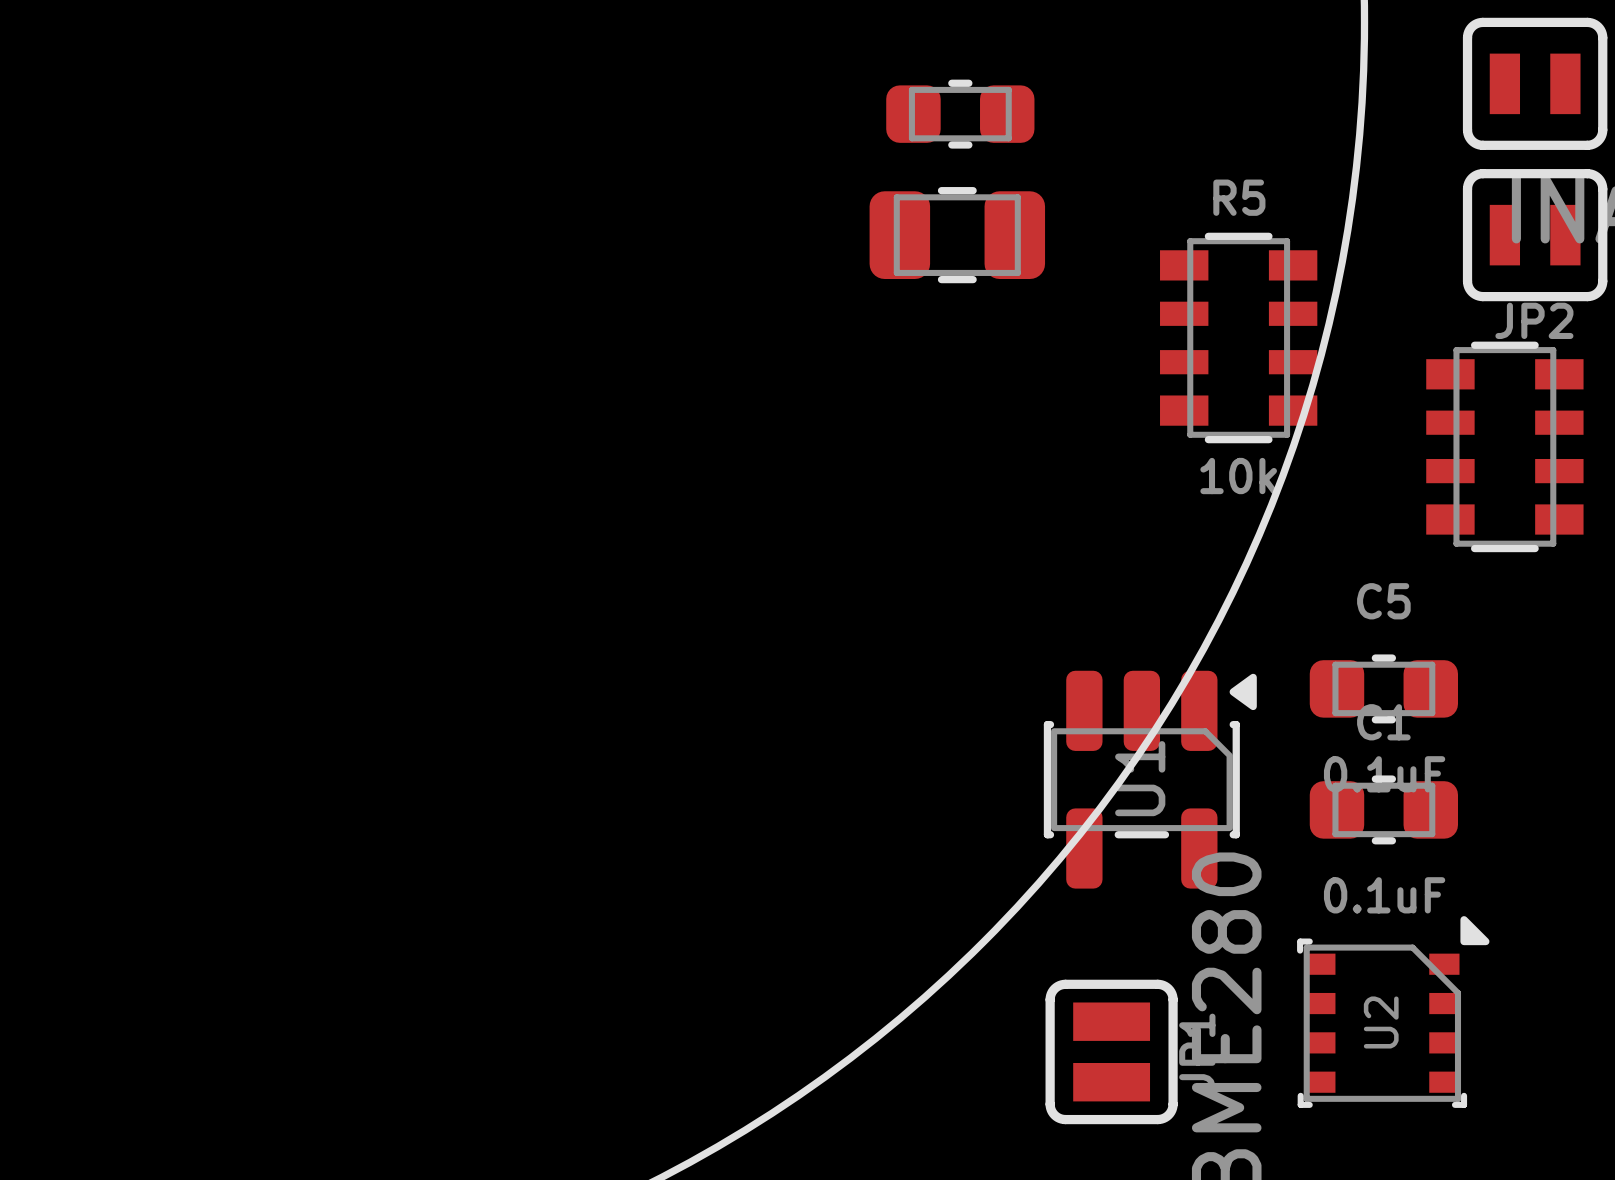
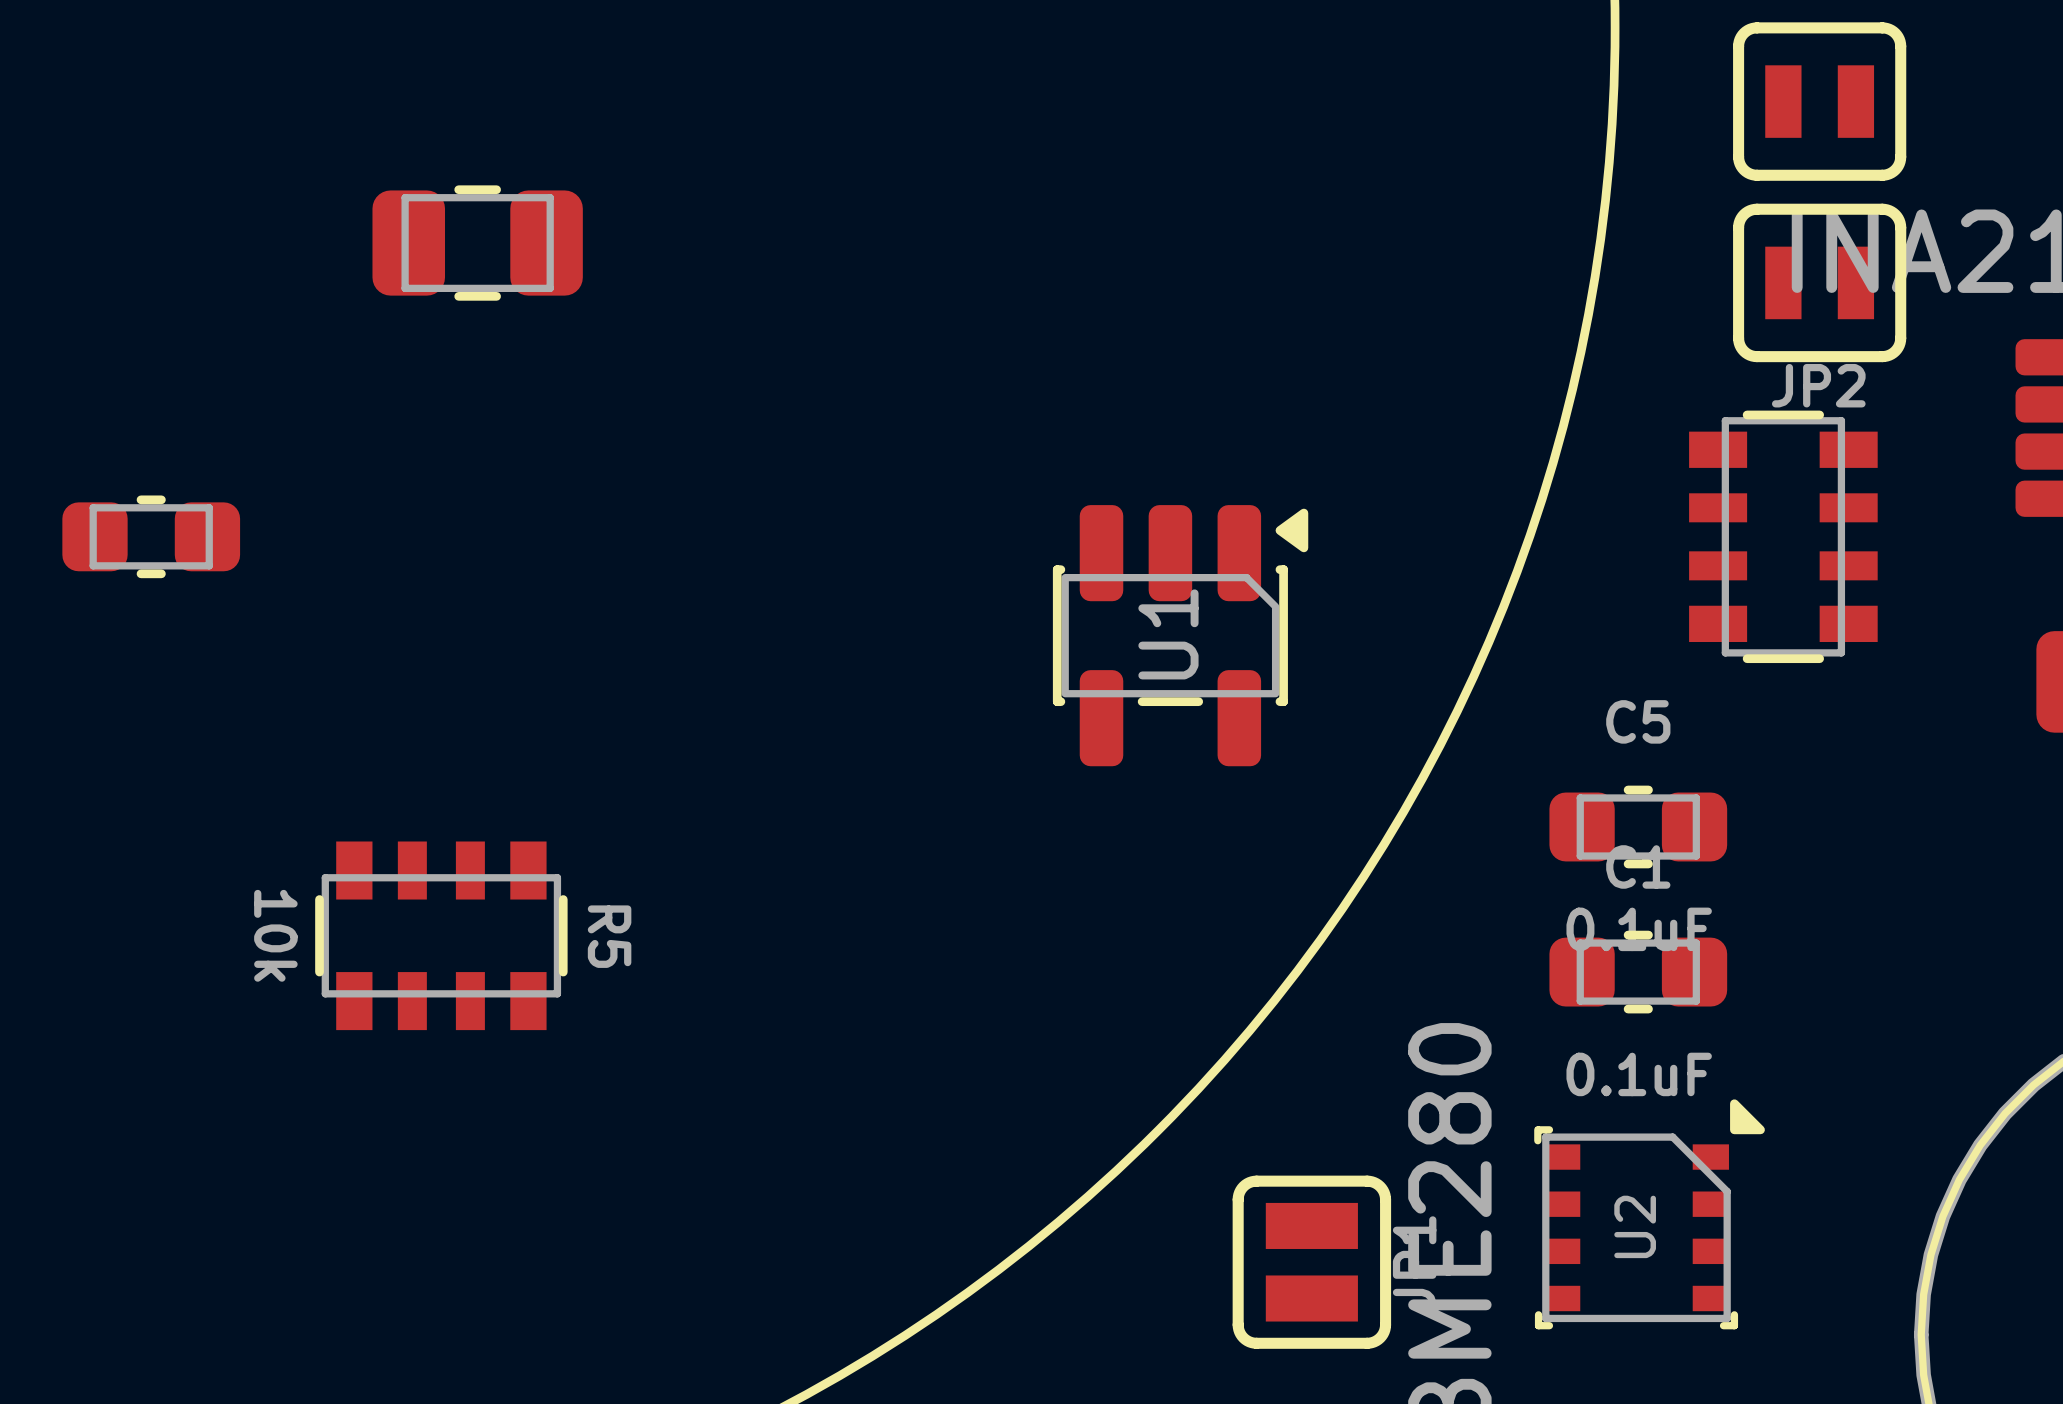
part position: (960, 114) -> (151, 536)
part position: (957, 235) -> (477, 243)
R5 rotation: 0° (1238, 337) -> 90° clockwise (441, 935)
R5 position: (1238, 337) -> (441, 935)
U1 position: (1150, 779) -> (1180, 635)

